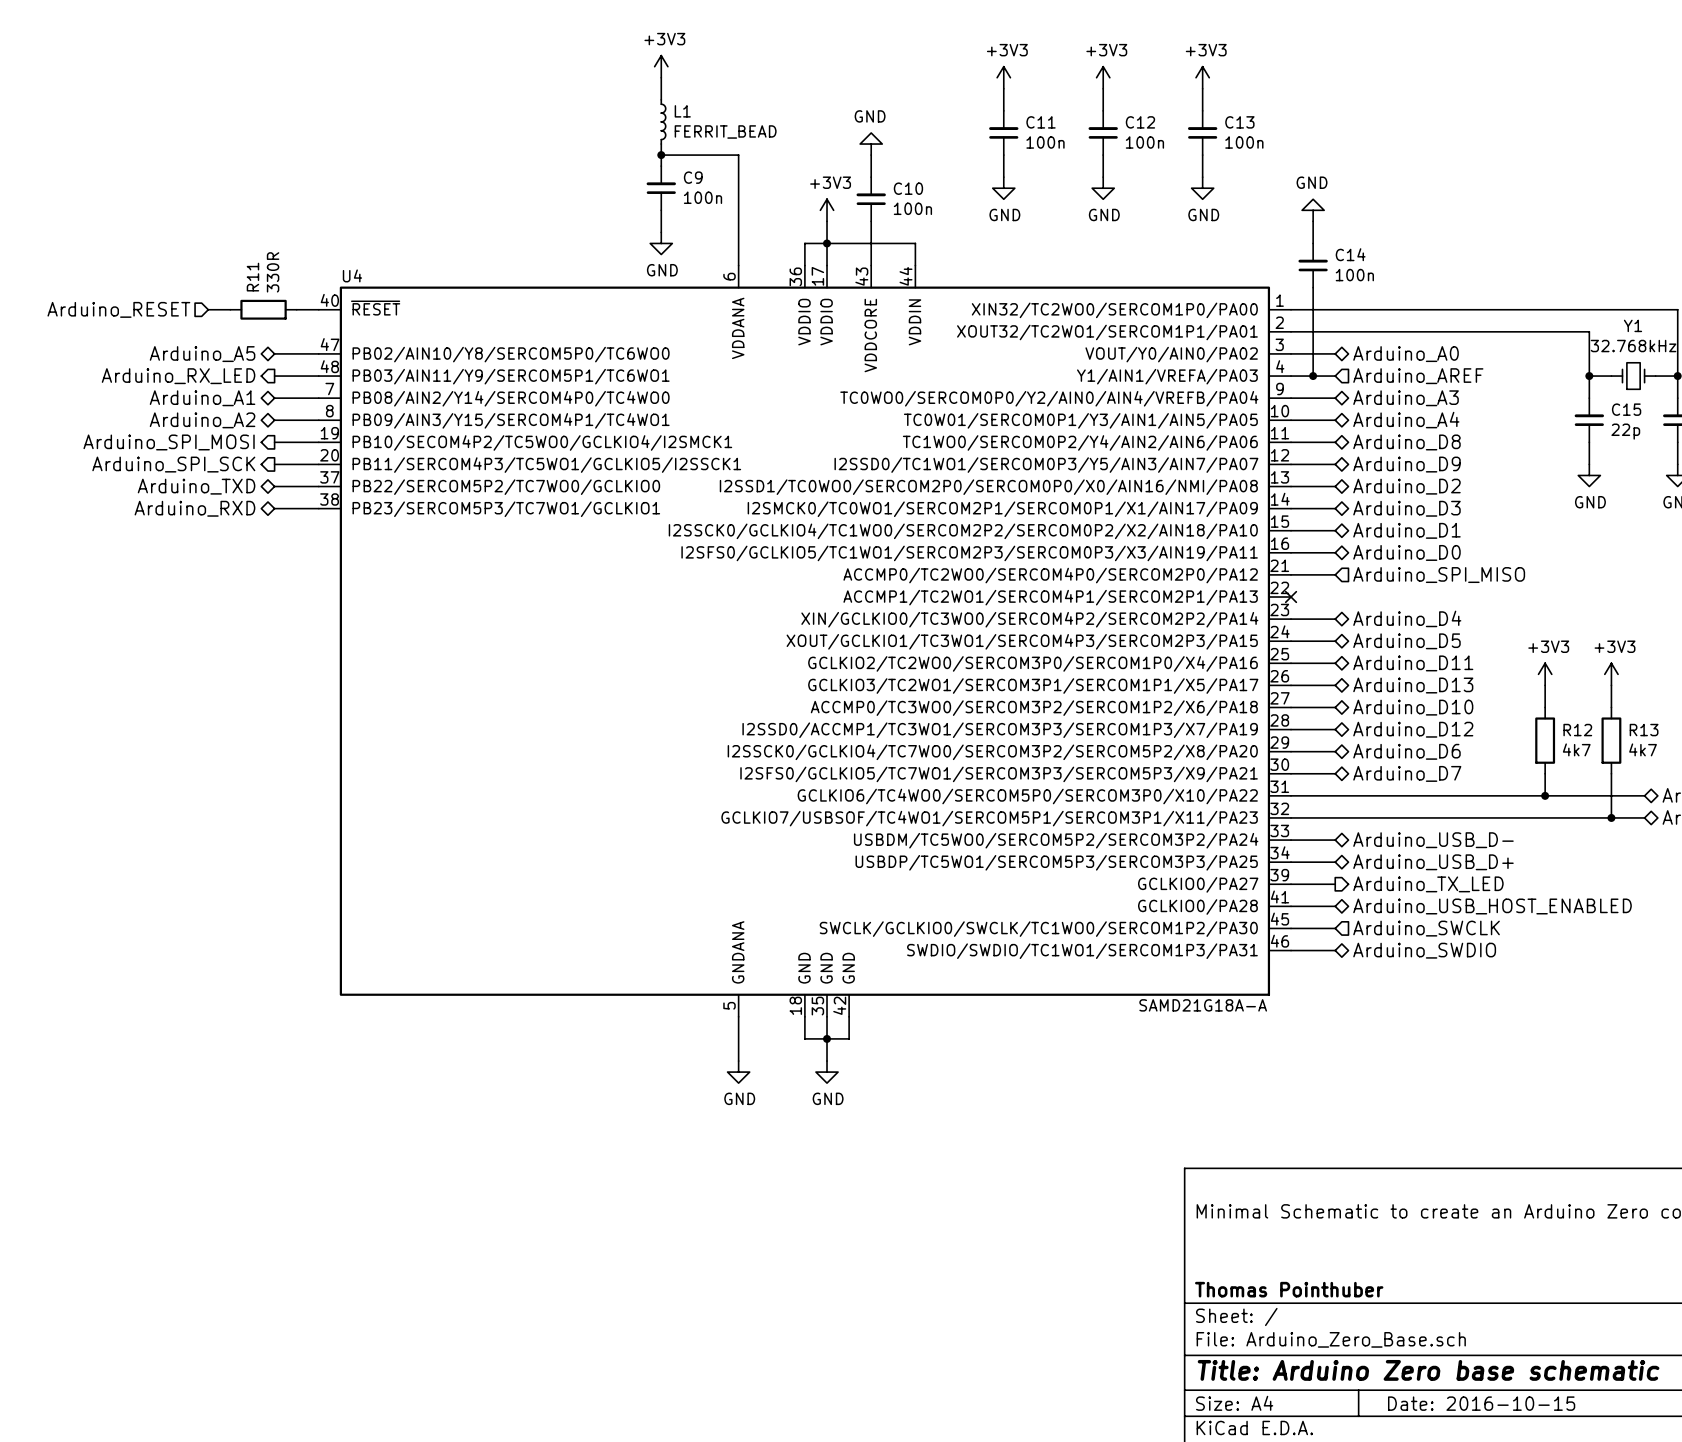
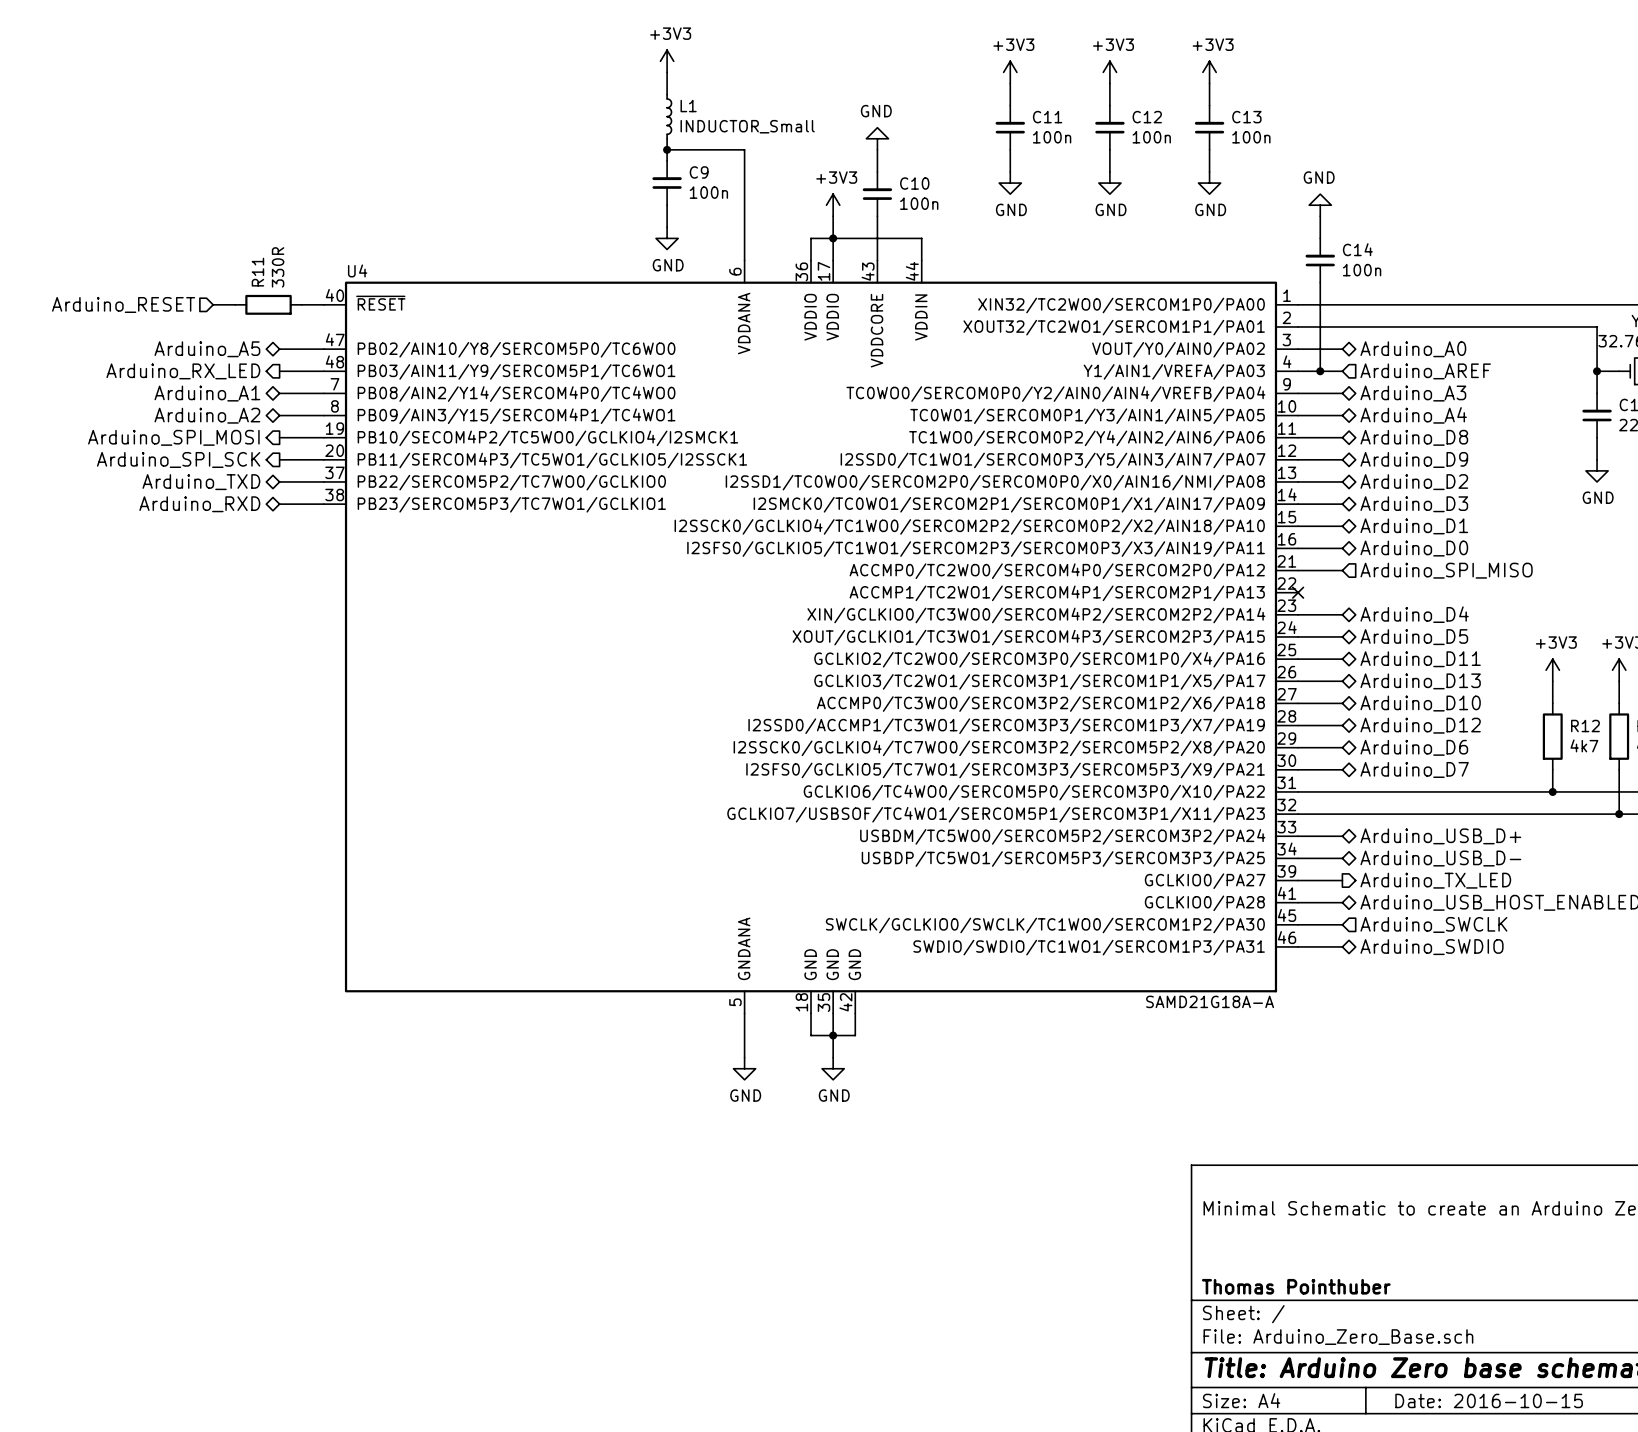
L1 value: FERRIT_BEAD (725, 131) -> INDUCTOR_Small (747, 126)
hierarchical label: Arduino_USB_D- (1433, 840) -> Arduino_USB_D+ (1440, 836)
hierarchical label: Arduino_USB_D+ (1433, 862) -> Arduino_USB_D- (1440, 858)

